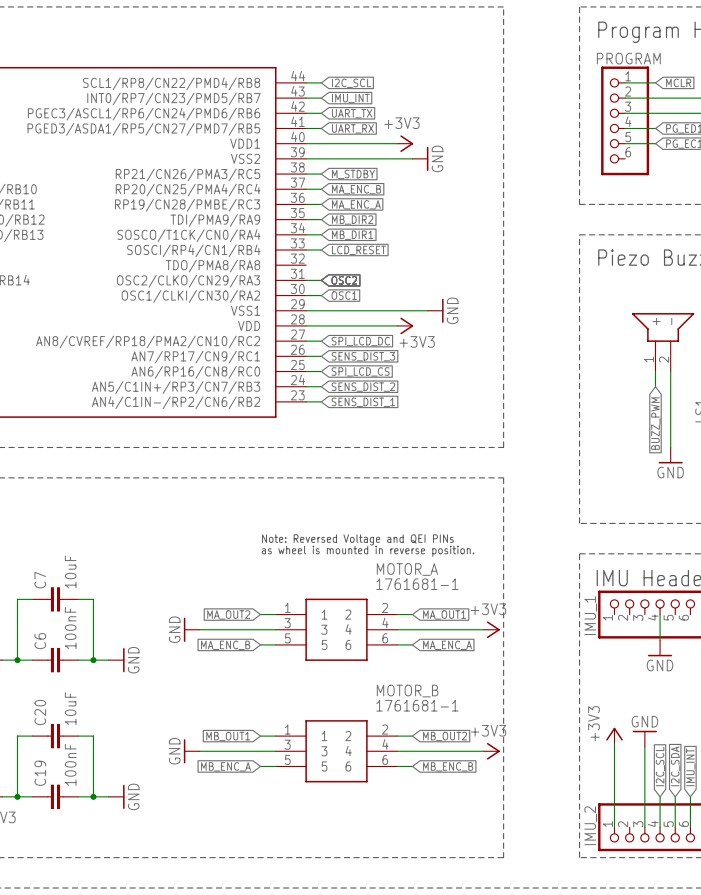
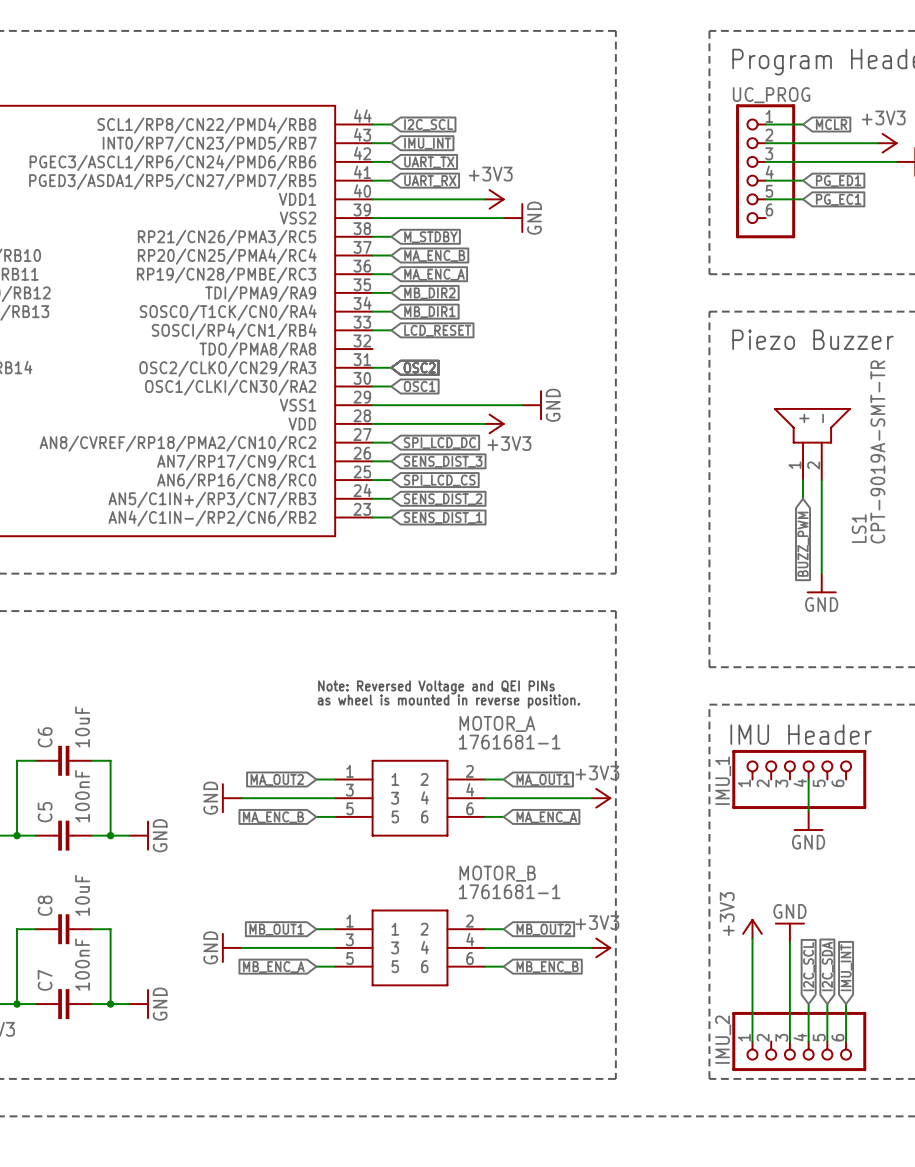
PROGRAM name: PROGRAM (628, 58) -> UC_PROG (771, 95)
C7 name: C7 (40, 580) -> C6 (45, 737)
C6 name: C6 (40, 641) -> C5 (45, 812)
C20 name: C20 (40, 712) -> C8 (45, 905)
C19 name: C19 (40, 773) -> C7 (45, 980)

